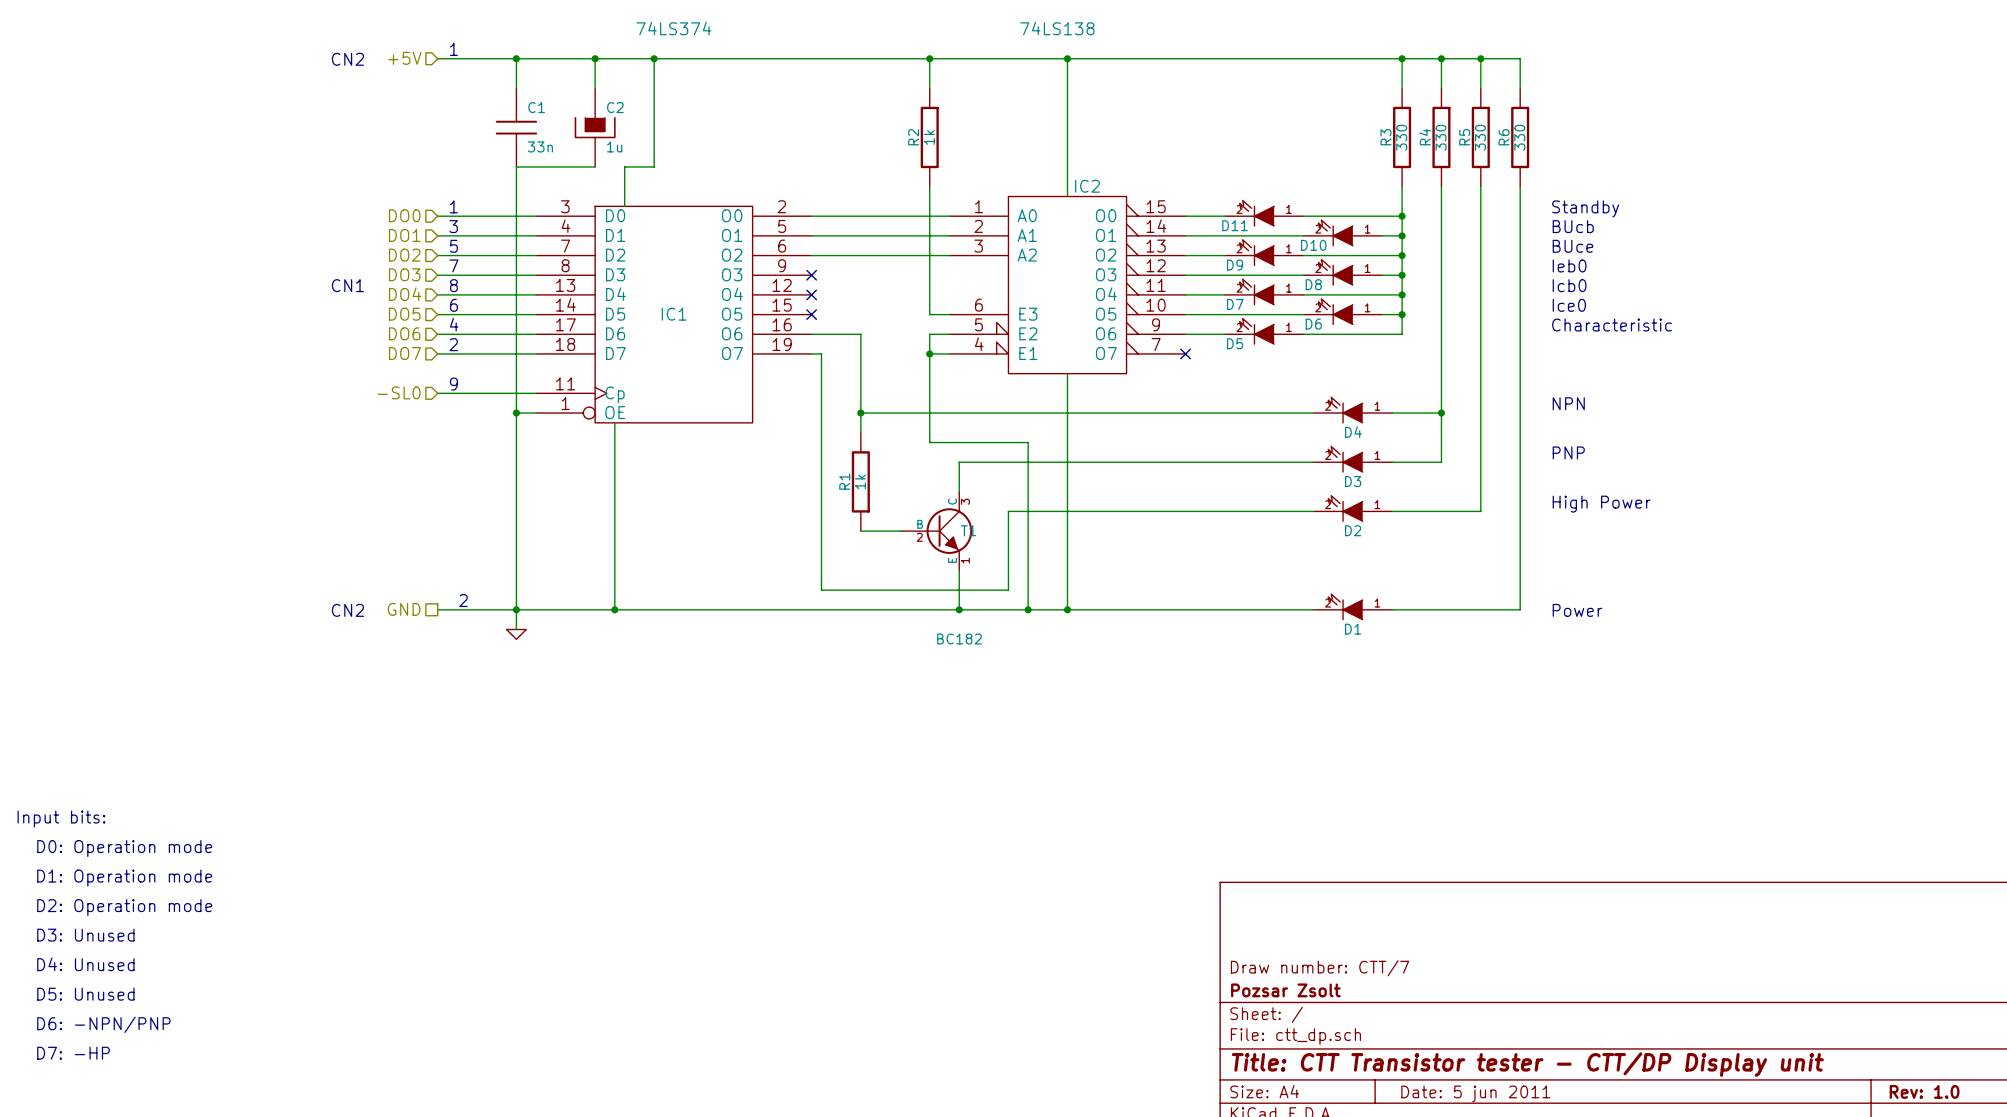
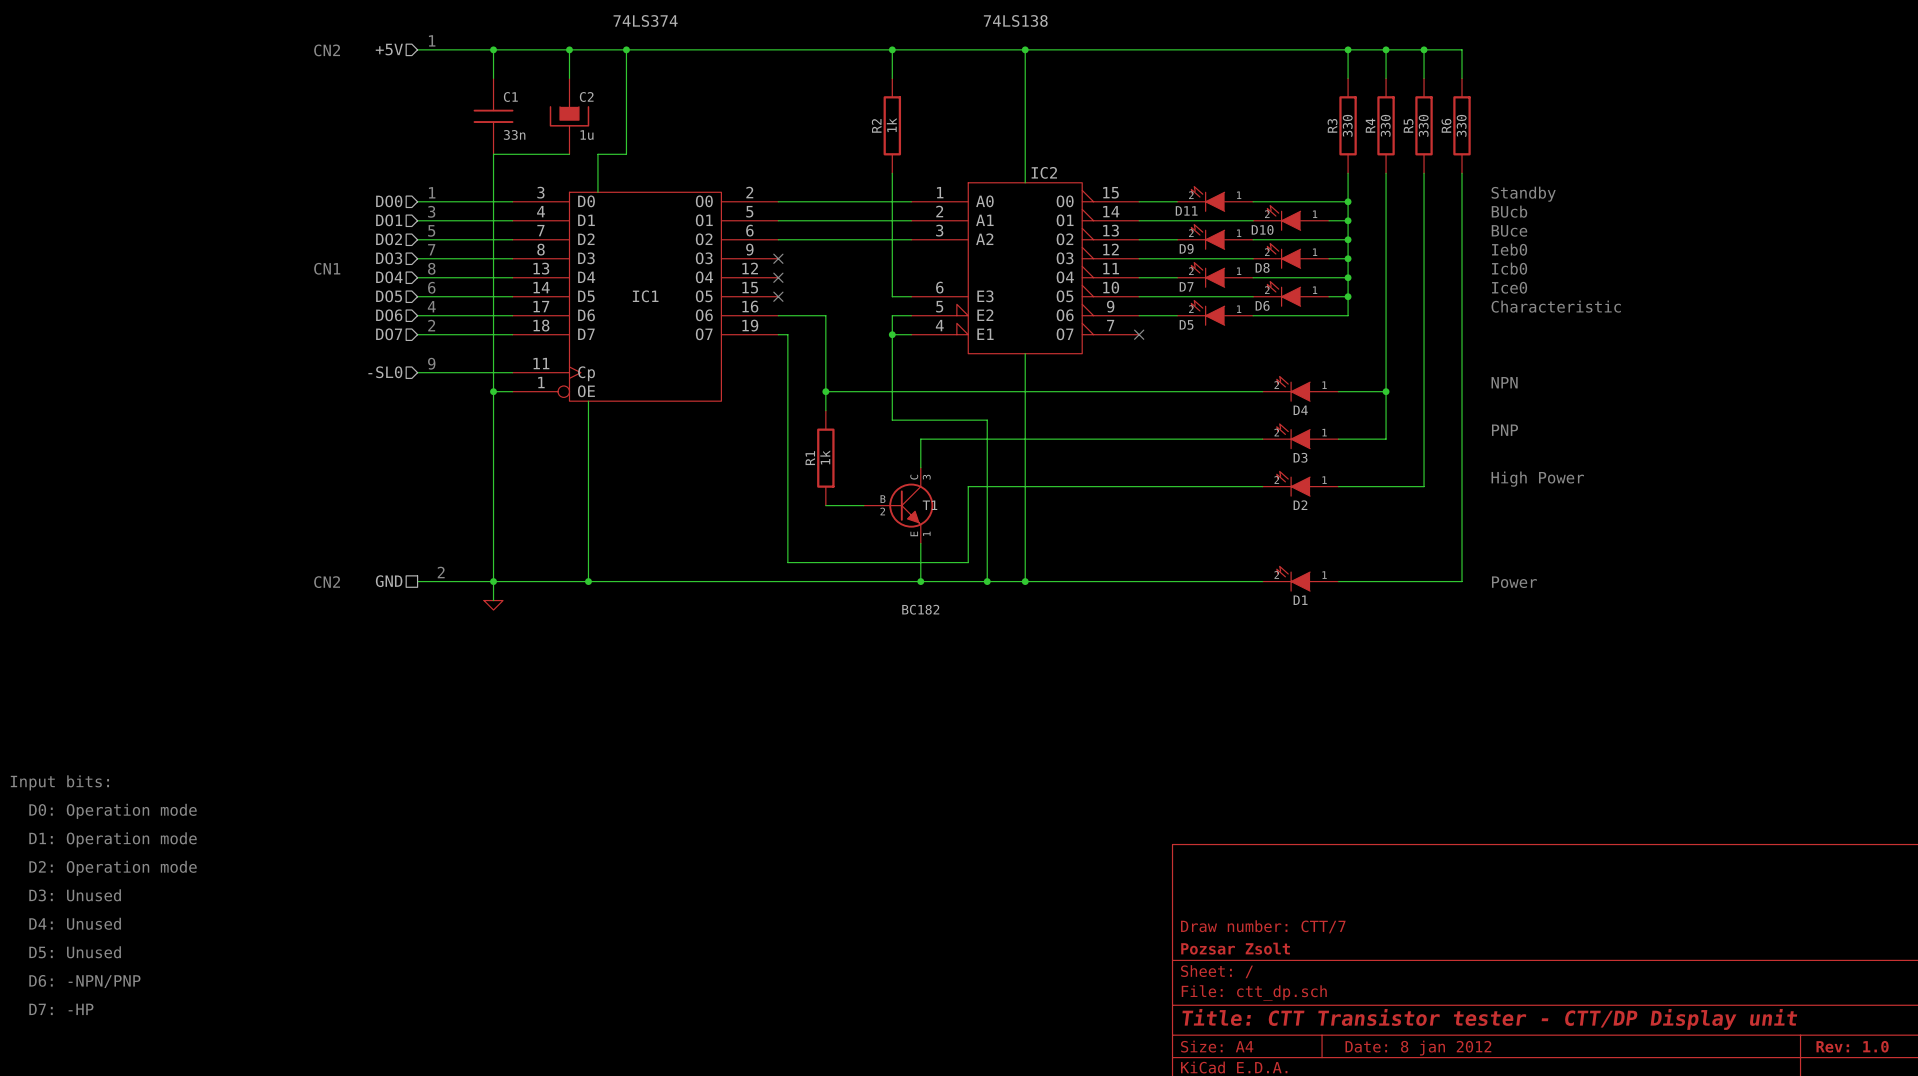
title block: Date: 5 jun 2011 (1475, 1093) -> Date: 8 jan 2012 (1418, 1048)

